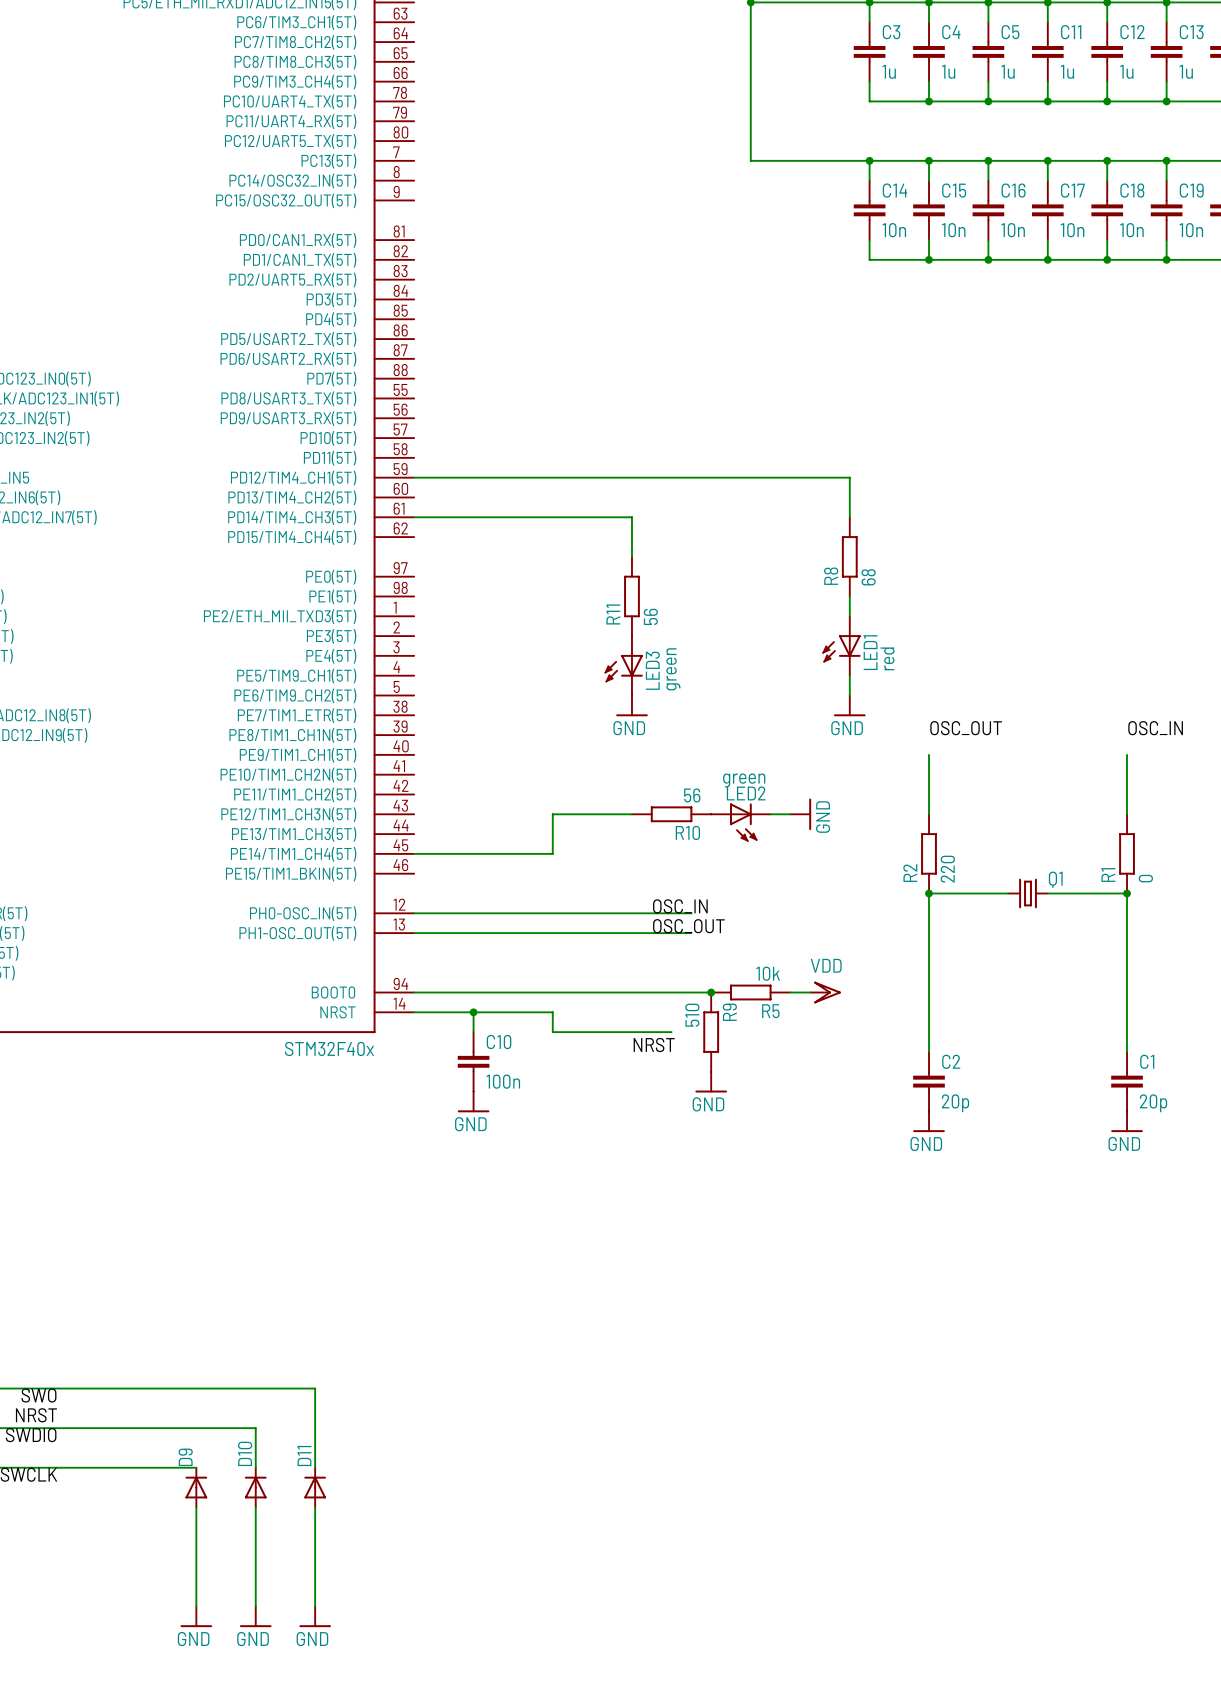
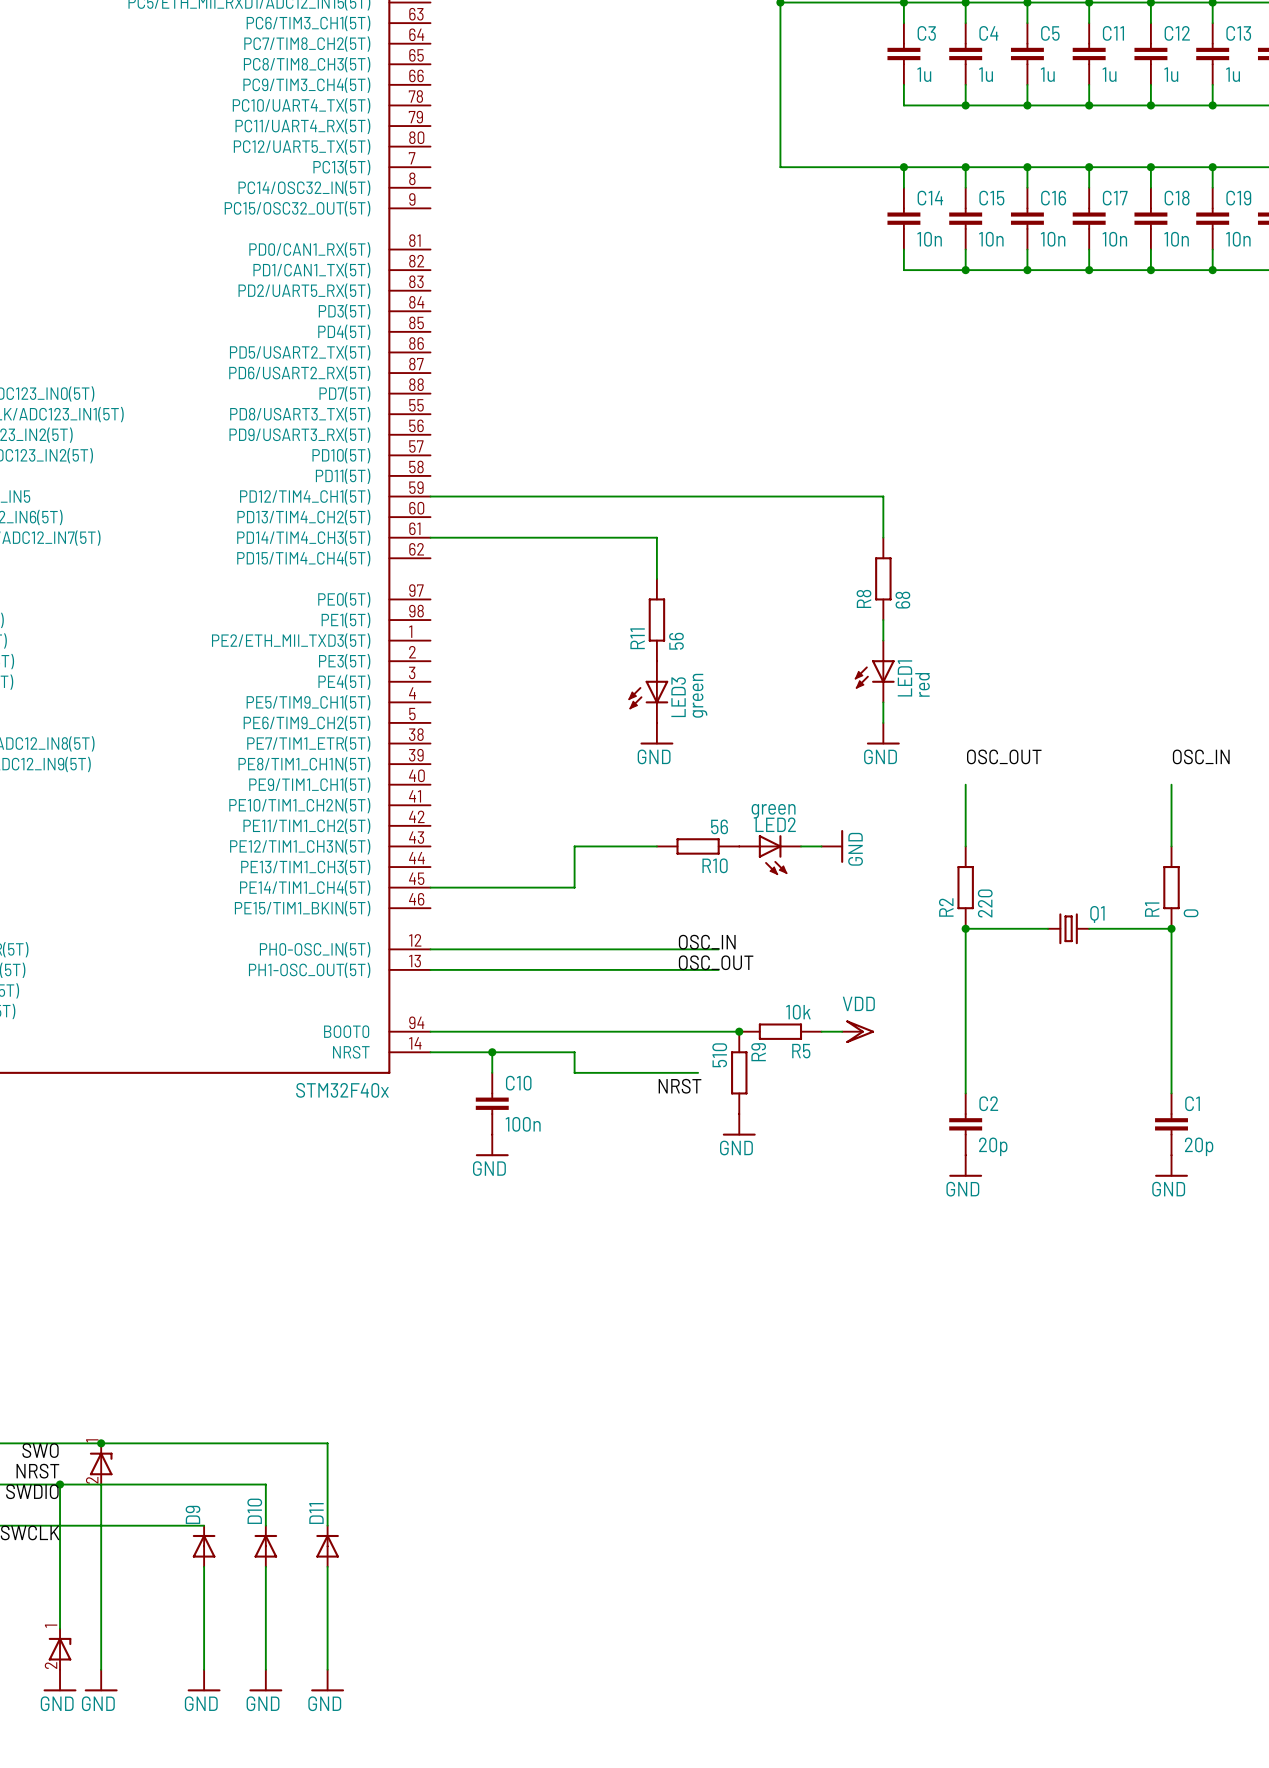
junction: none -> (101, 1443)
part: none -> (101, 1463)
wire: none -> (60, 1484) (60, 1628)
junction: none -> (60, 1484)
wire: none -> (101, 1484) (101, 1669)
part: none -> (60, 1649)
power symbol: none -> GND (60, 1680)
power symbol: none -> GND (101, 1680)

